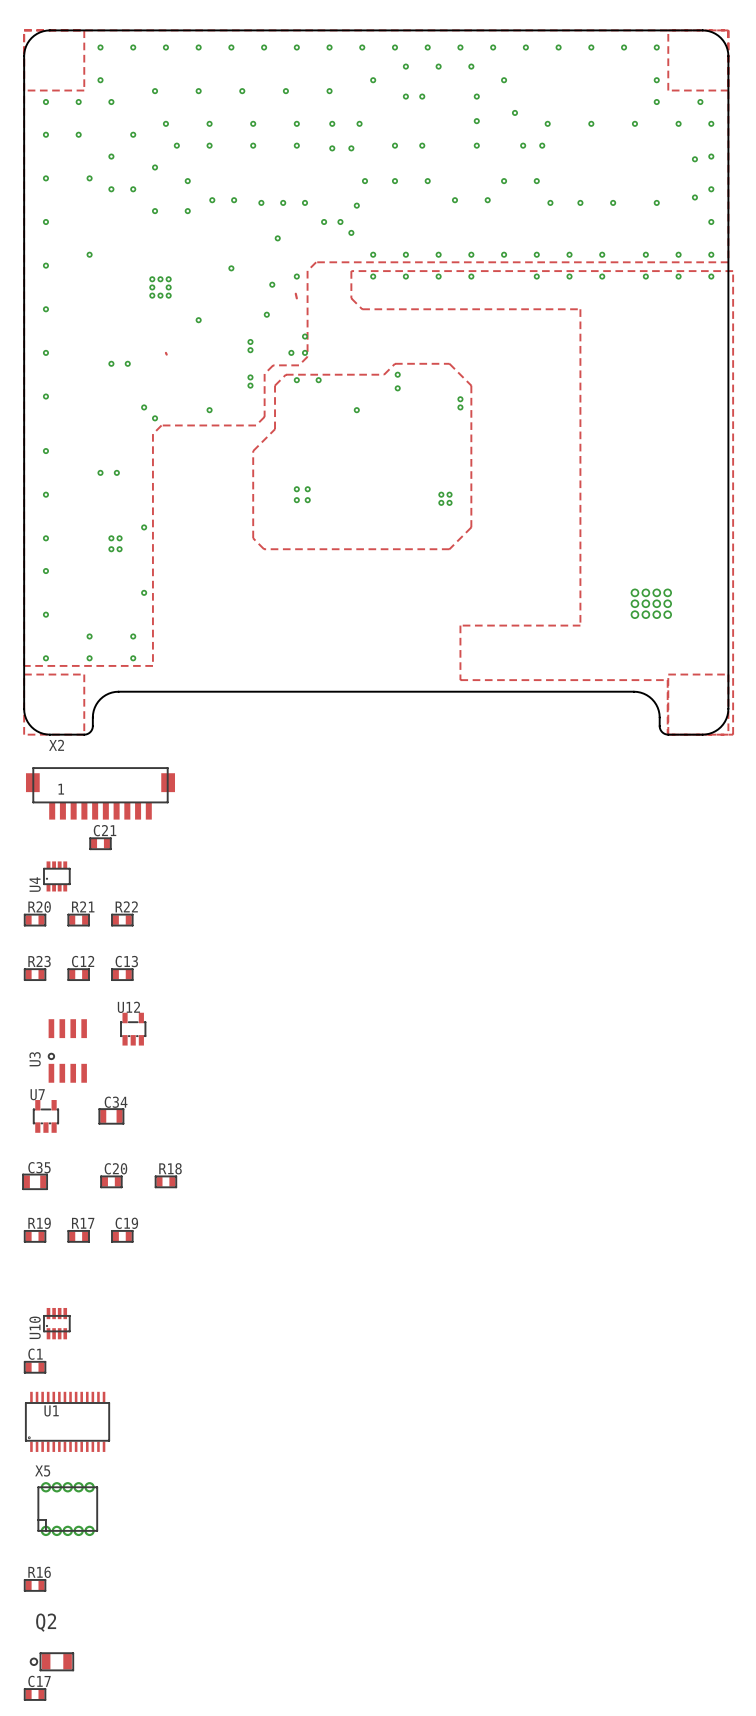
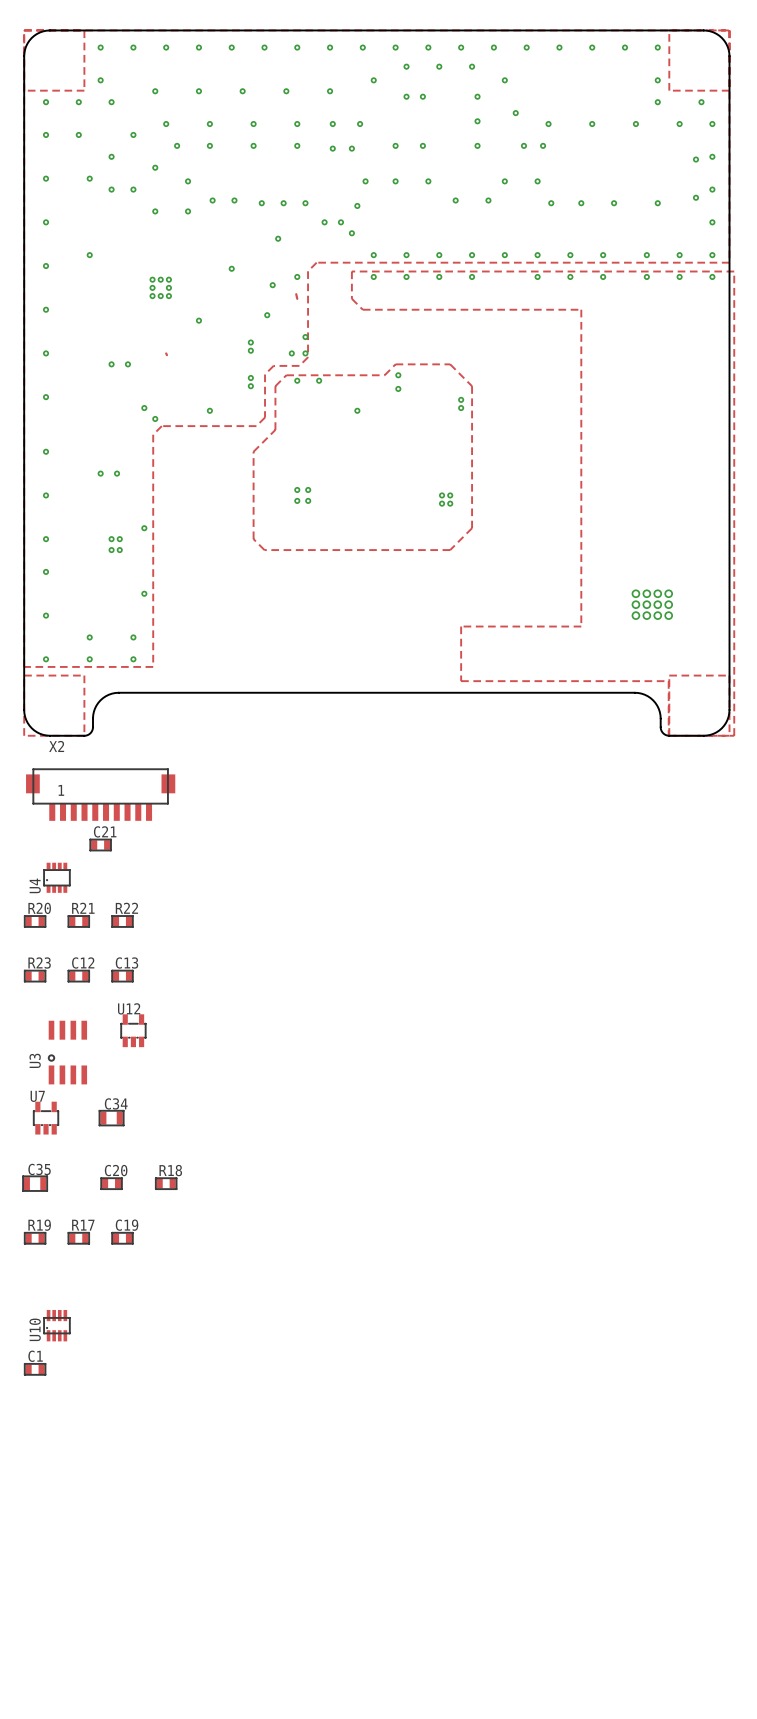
U1: (67, 1421) -> none
X5: (67, 1509) -> none
R16: (35, 1585) -> none
Q2: (51, 1661) -> none
C17: (35, 1694) -> none

